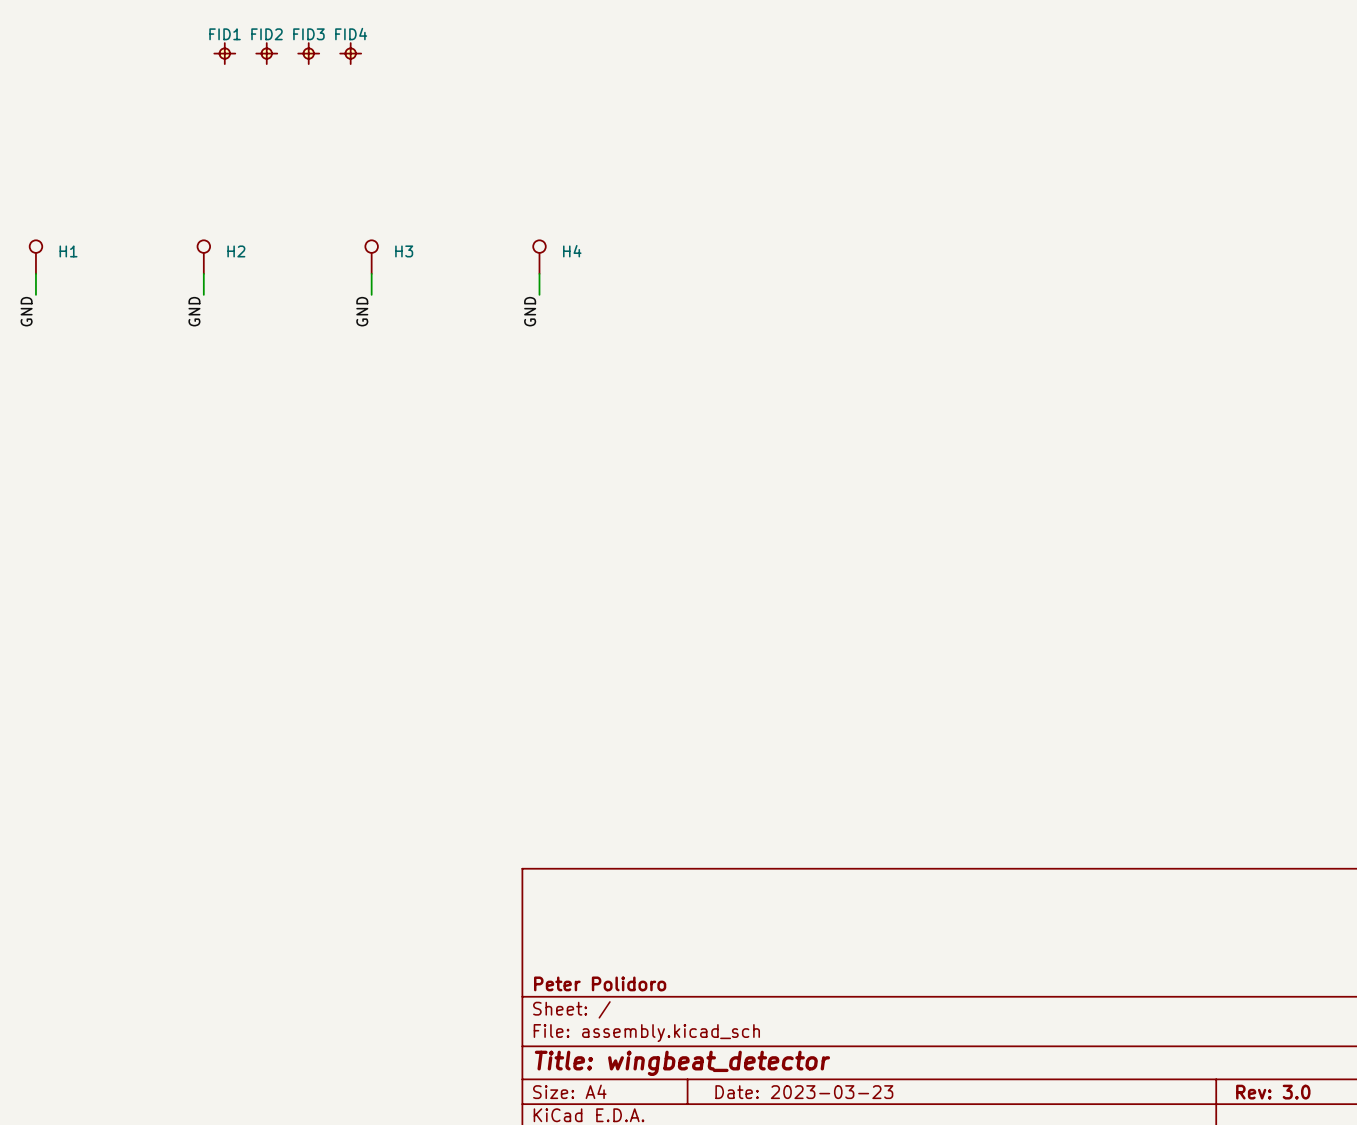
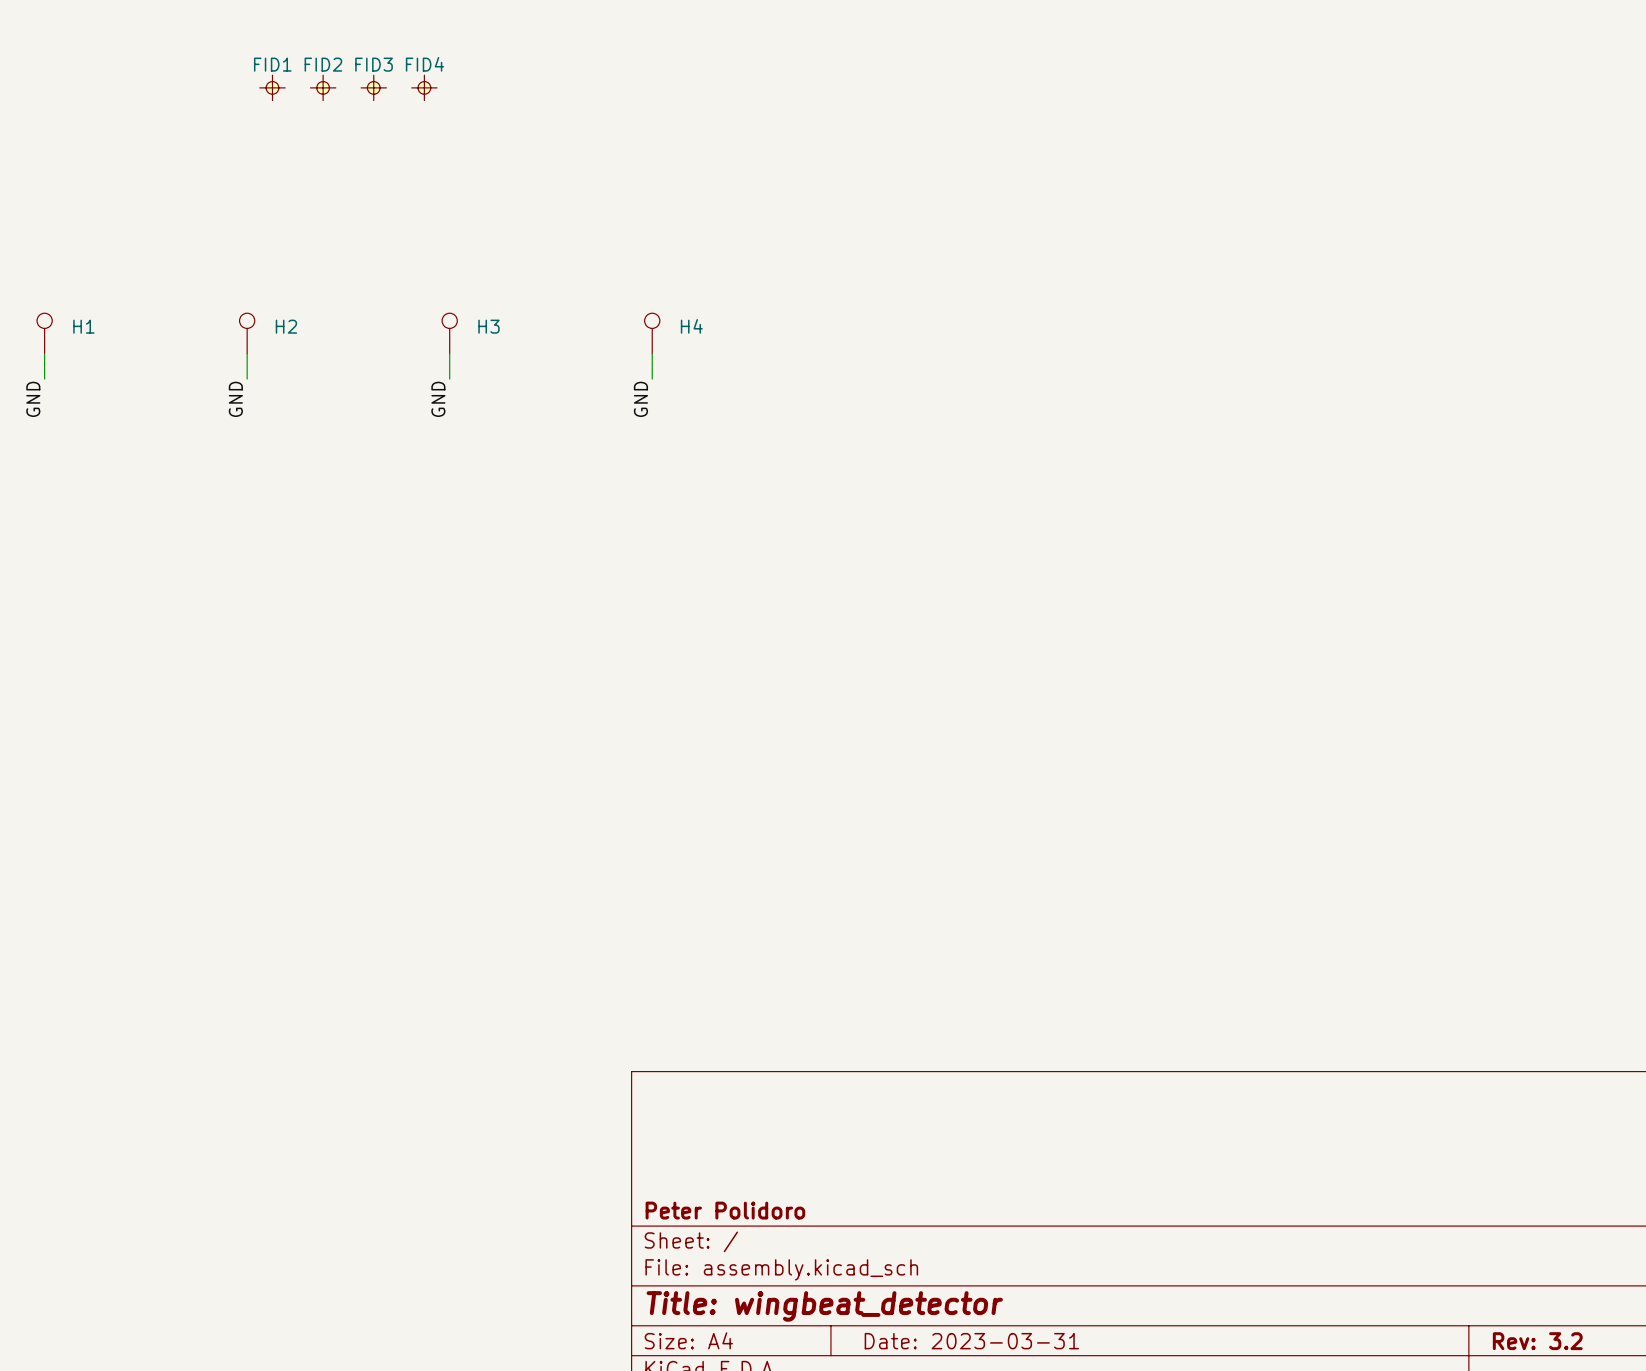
title block: Date: 2023-03-23 (804, 1092) -> Date: 2023-03-31 (971, 1341)
title block: Rev: 3.0 (1273, 1092) -> Rev: 3.2 (1537, 1341)

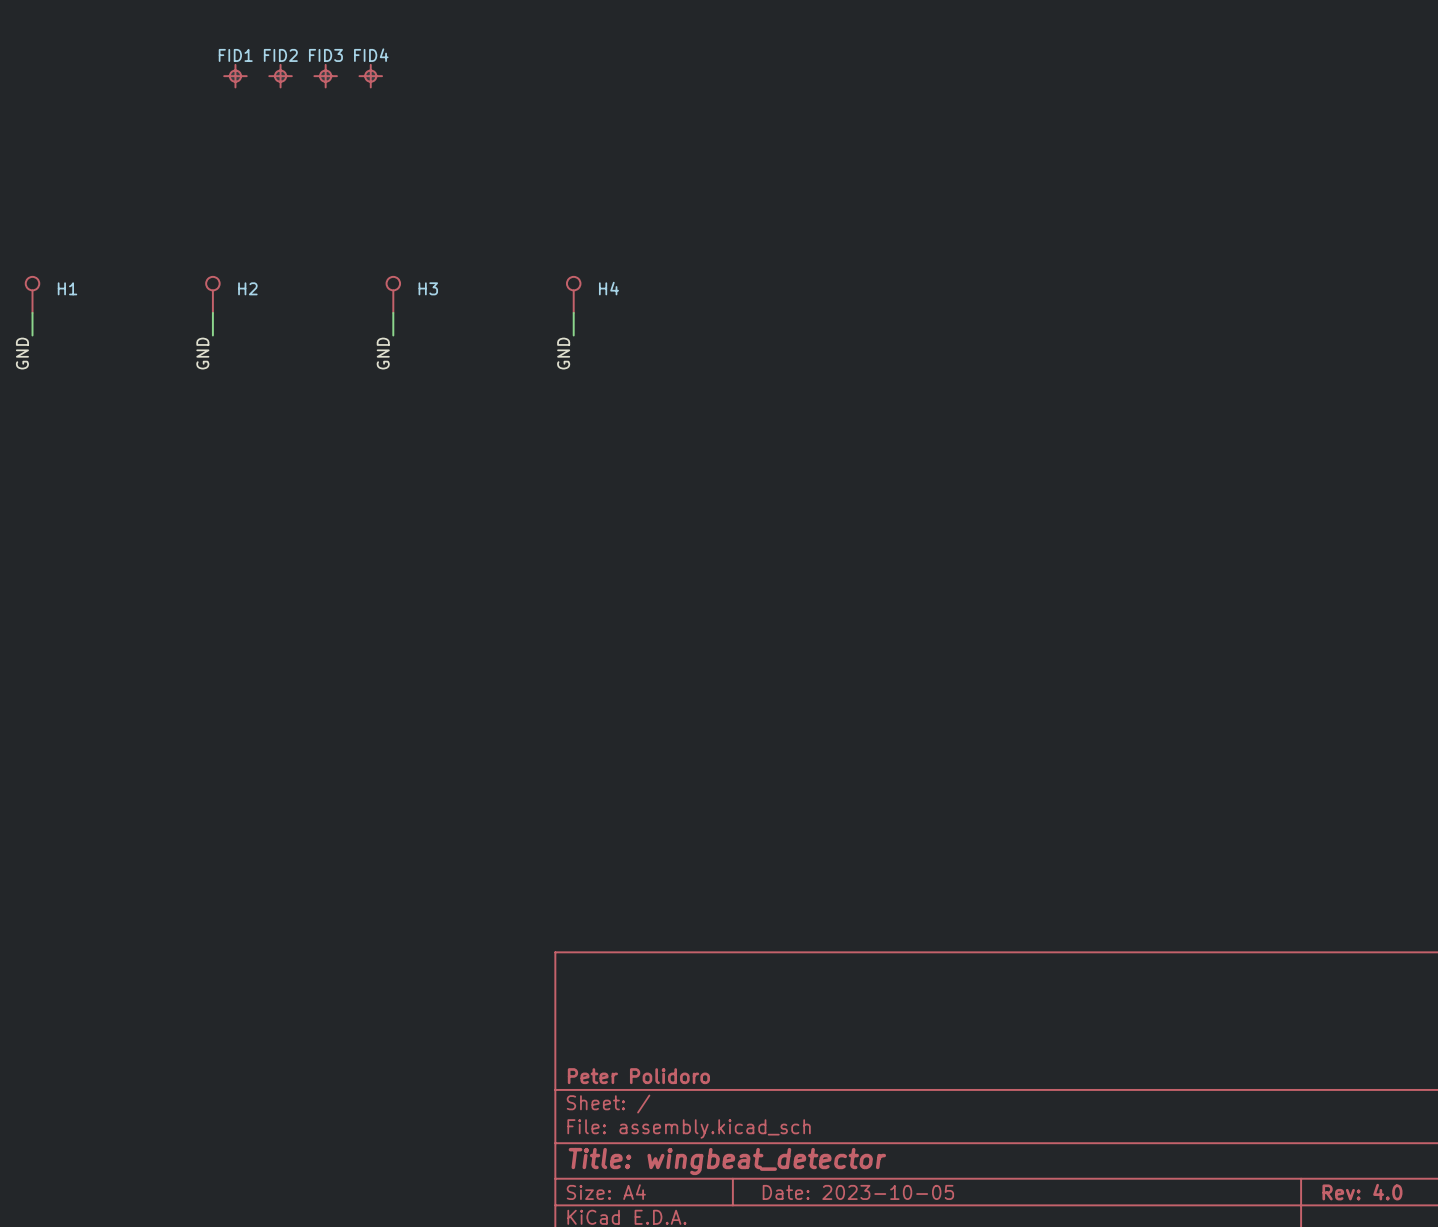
title block: Date: 2023-03-31 (971, 1341) -> Date: 2023-10-05 (858, 1192)
title block: Rev: 3.2 (1537, 1341) -> Rev: 4.0 (1362, 1192)

